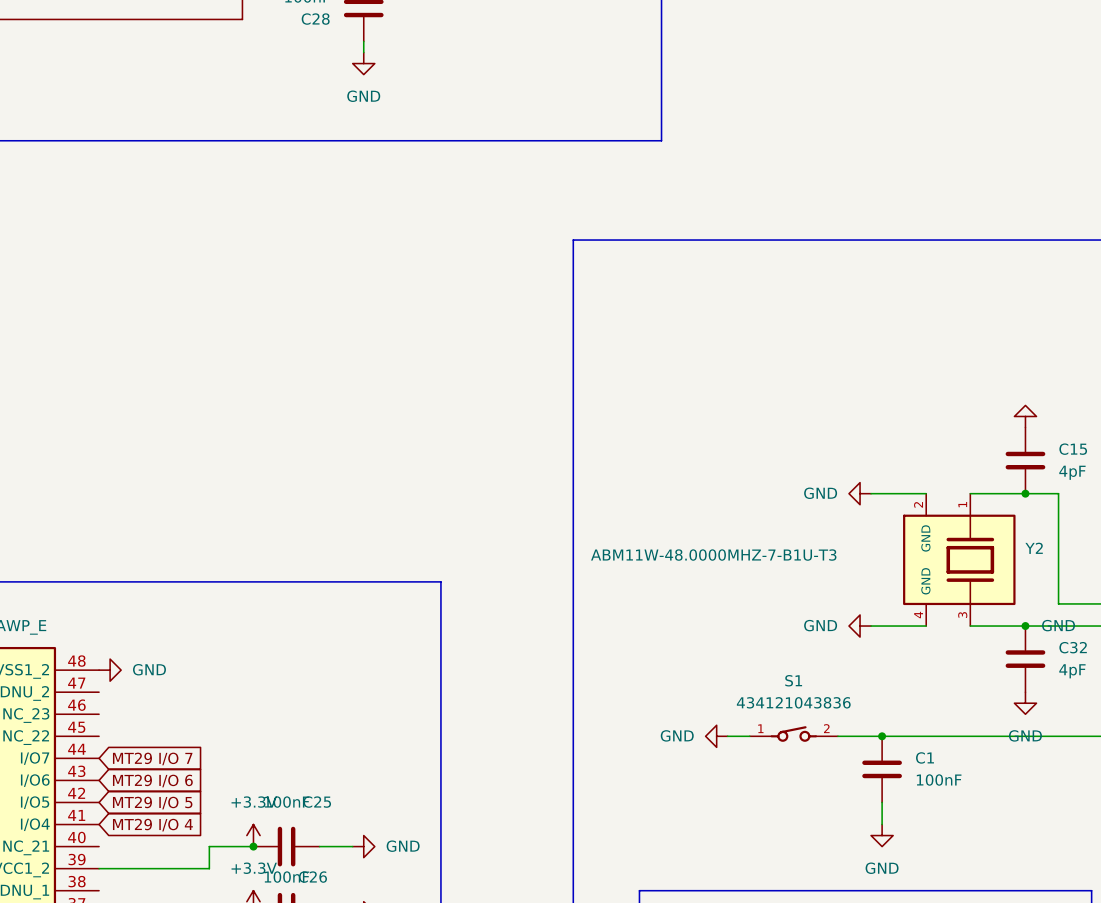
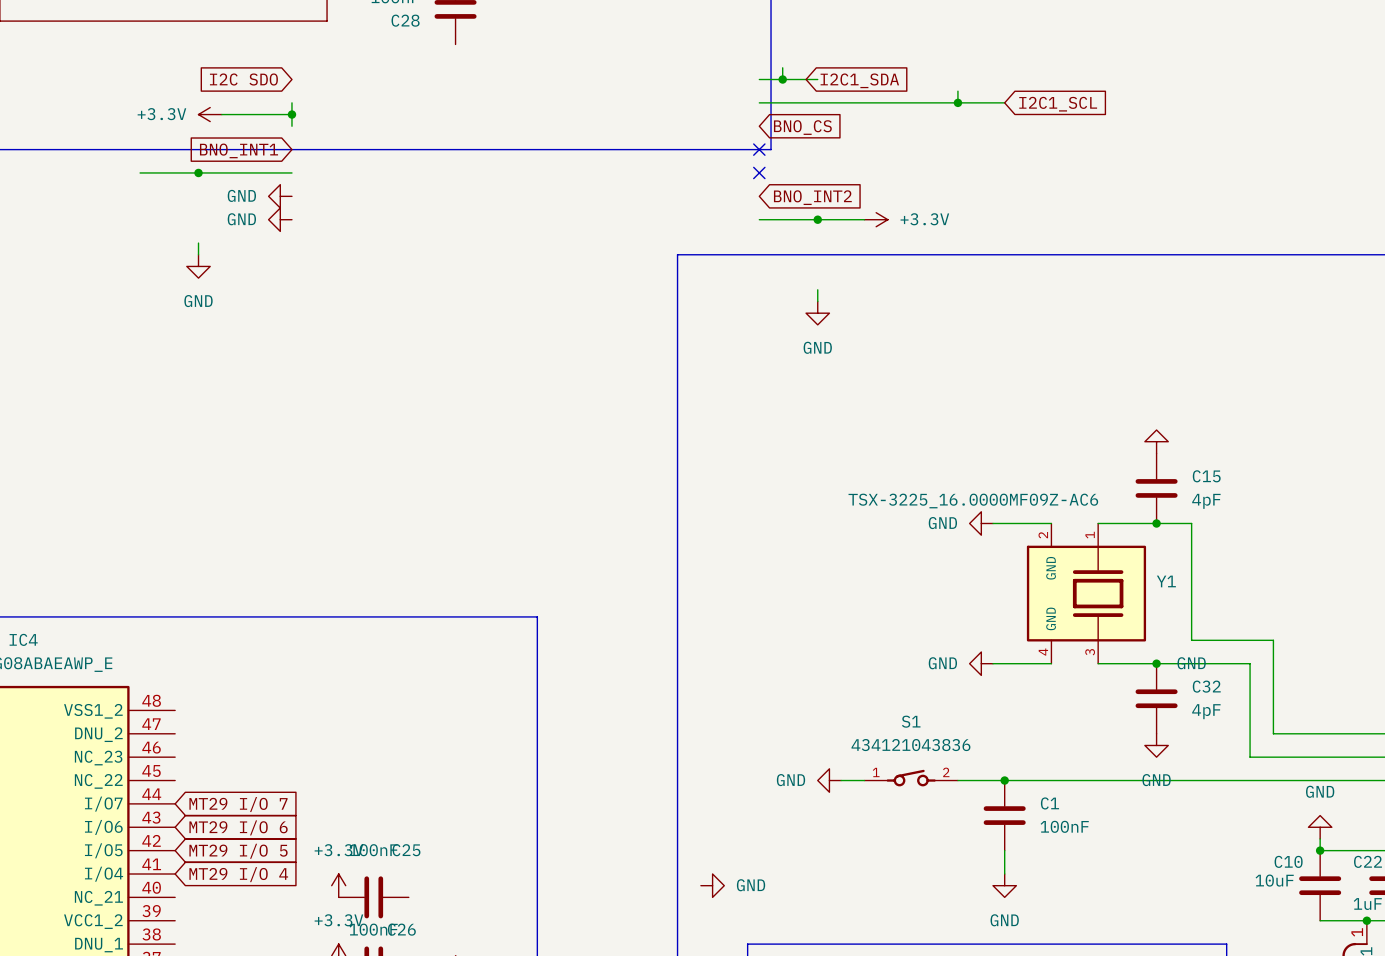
wire: (363, 41) (363, 52) -> none
power symbol: GND (363, 63) -> none
wire: none -> (782, 67) (782, 79)
global label: none -> I2C SDO (243, 79)
wire: none -> (759, 79) (817, 79)
junction: none -> (782, 79)
global label: none -> I2C1_SDA (859, 80)
wire: none -> (957, 91) (957, 102)
wire: none -> (291, 102) (291, 126)
wire: none -> (759, 102) (1004, 102)
junction: none -> (957, 102)
global label: none -> I2C1_SCL (1058, 104)
power symbol: none -> +3.3V (210, 114)
wire: none -> (221, 114) (291, 114)
junction: none -> (291, 114)
global label: none -> BNO_CS (802, 127)
no-connect mark: none -> (759, 149)
global label: none -> BNO_INT1 (239, 150)
wire: none -> (140, 172) (291, 172)
junction: none -> (198, 172)
no-connect mark: none -> (759, 172)
power symbol: none -> GND (280, 196)
global label: none -> BNO_INT2 (812, 197)
power symbol: none -> GND (280, 219)
wire: none -> (759, 219) (864, 219)
junction: none -> (817, 219)
power symbol: none -> +3.3V (876, 219)
wire: none -> (198, 243) (198, 254)
power symbol: none -> GND (198, 266)
wire: none -> (817, 289) (817, 301)
power symbol: none -> GND (817, 313)
Y2 name: Y2 (1034, 548) -> Y1 (1166, 581)
Y2 value: ABM11W-48.0000MHZ-7-B1U-T3 (713, 555) -> TSX-3225_16.0000MF09Z-AC6 (973, 501)
power symbol: GND (110, 670) -> none
power symbol: none -> GND (712, 885)
wire: (253, 846) (209, 846) (209, 868) (99, 868) -> none
junction: (253, 846) -> none
wire: (319, 846) (352, 846) -> none
power symbol: GND (363, 846) -> none

